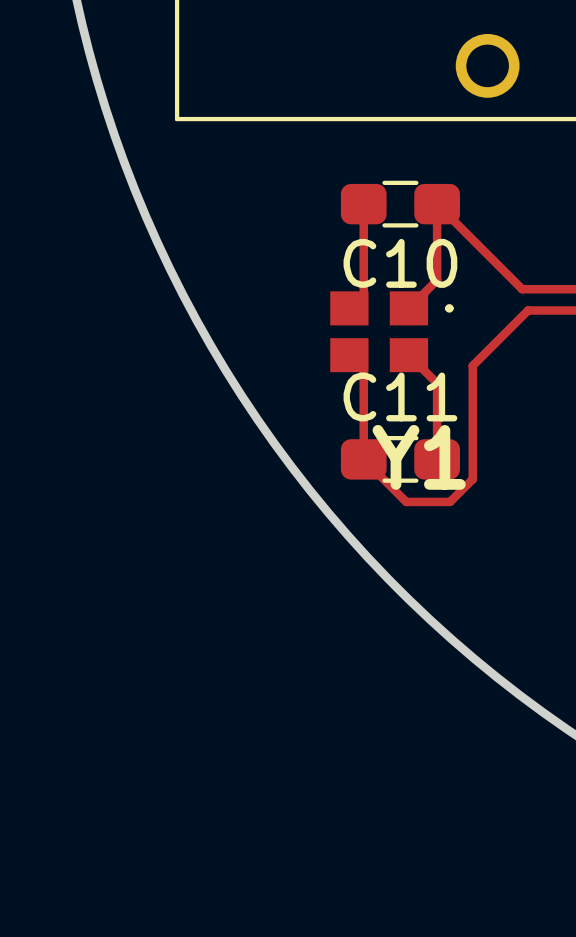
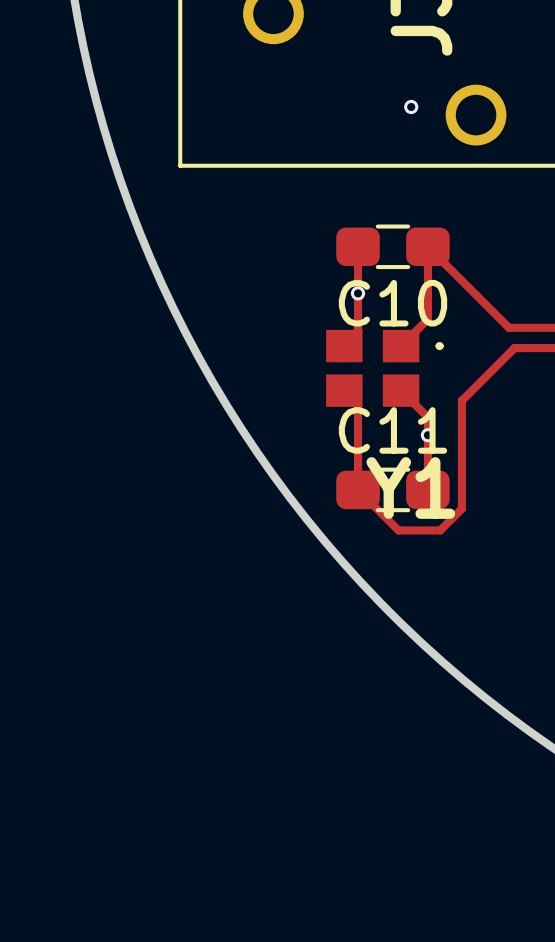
via: none -> (411, 106)
via: none -> (358, 293)
via: none -> (427, 435)

